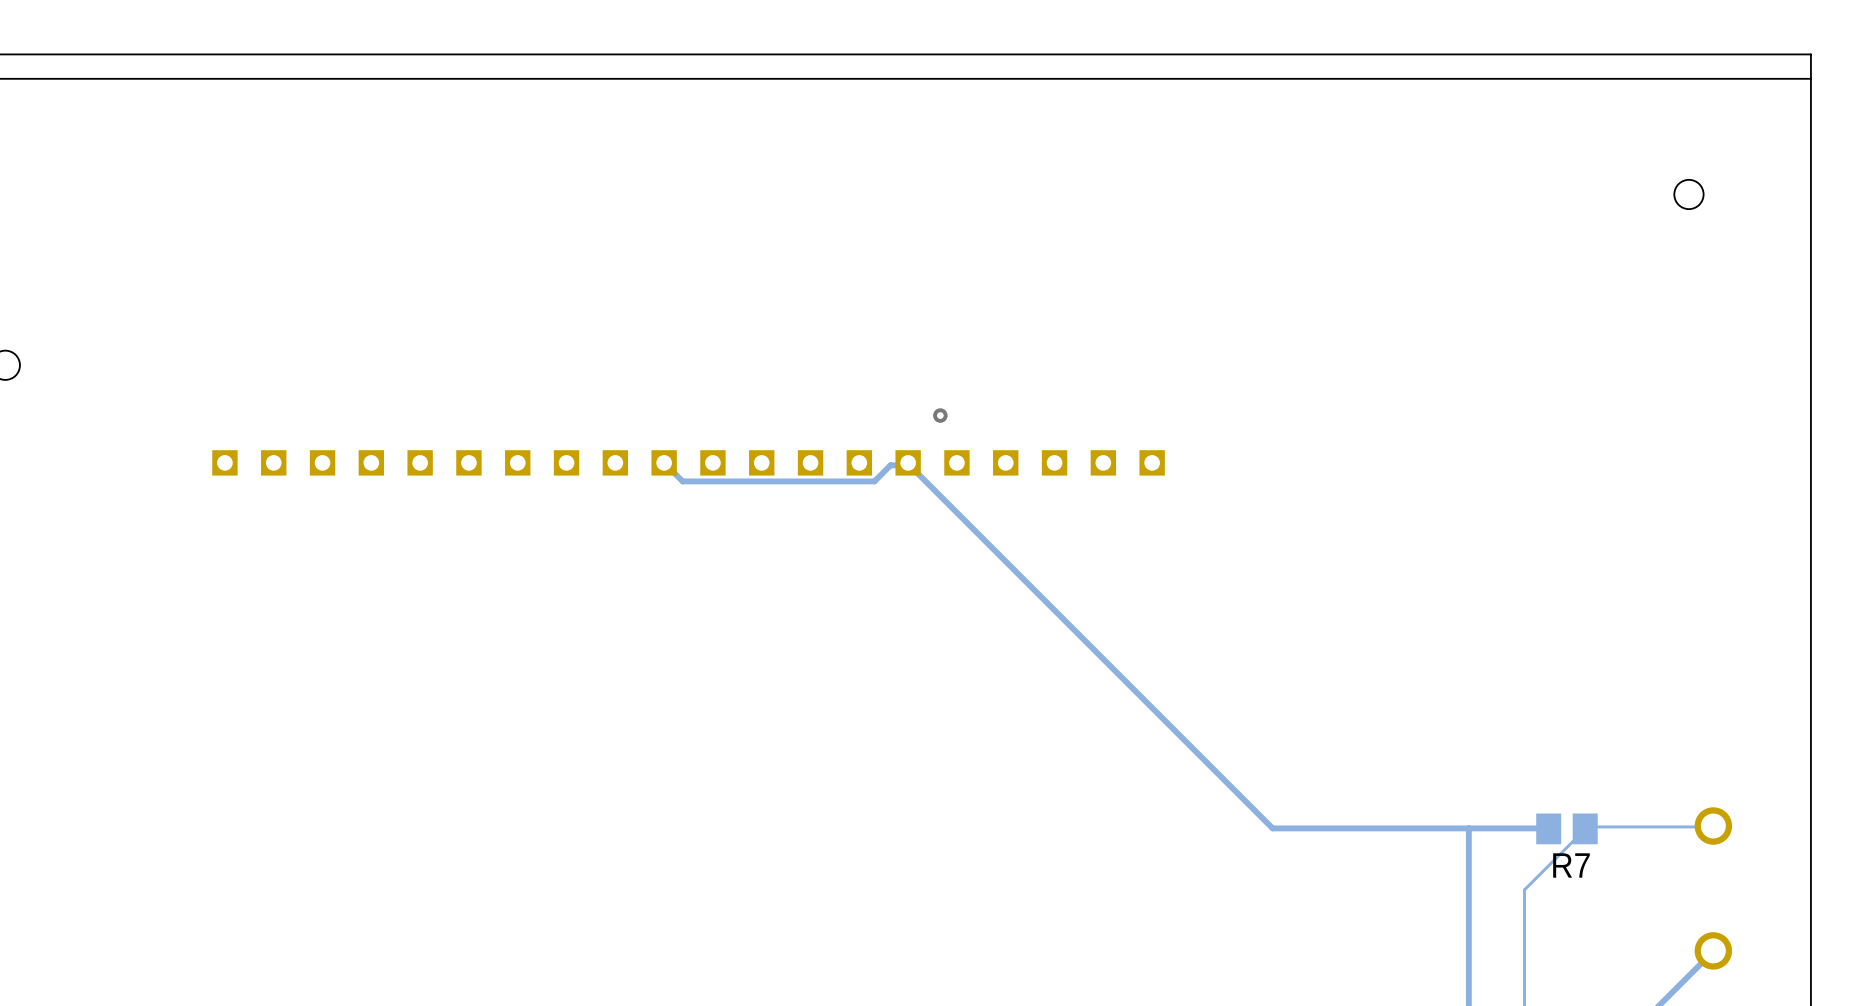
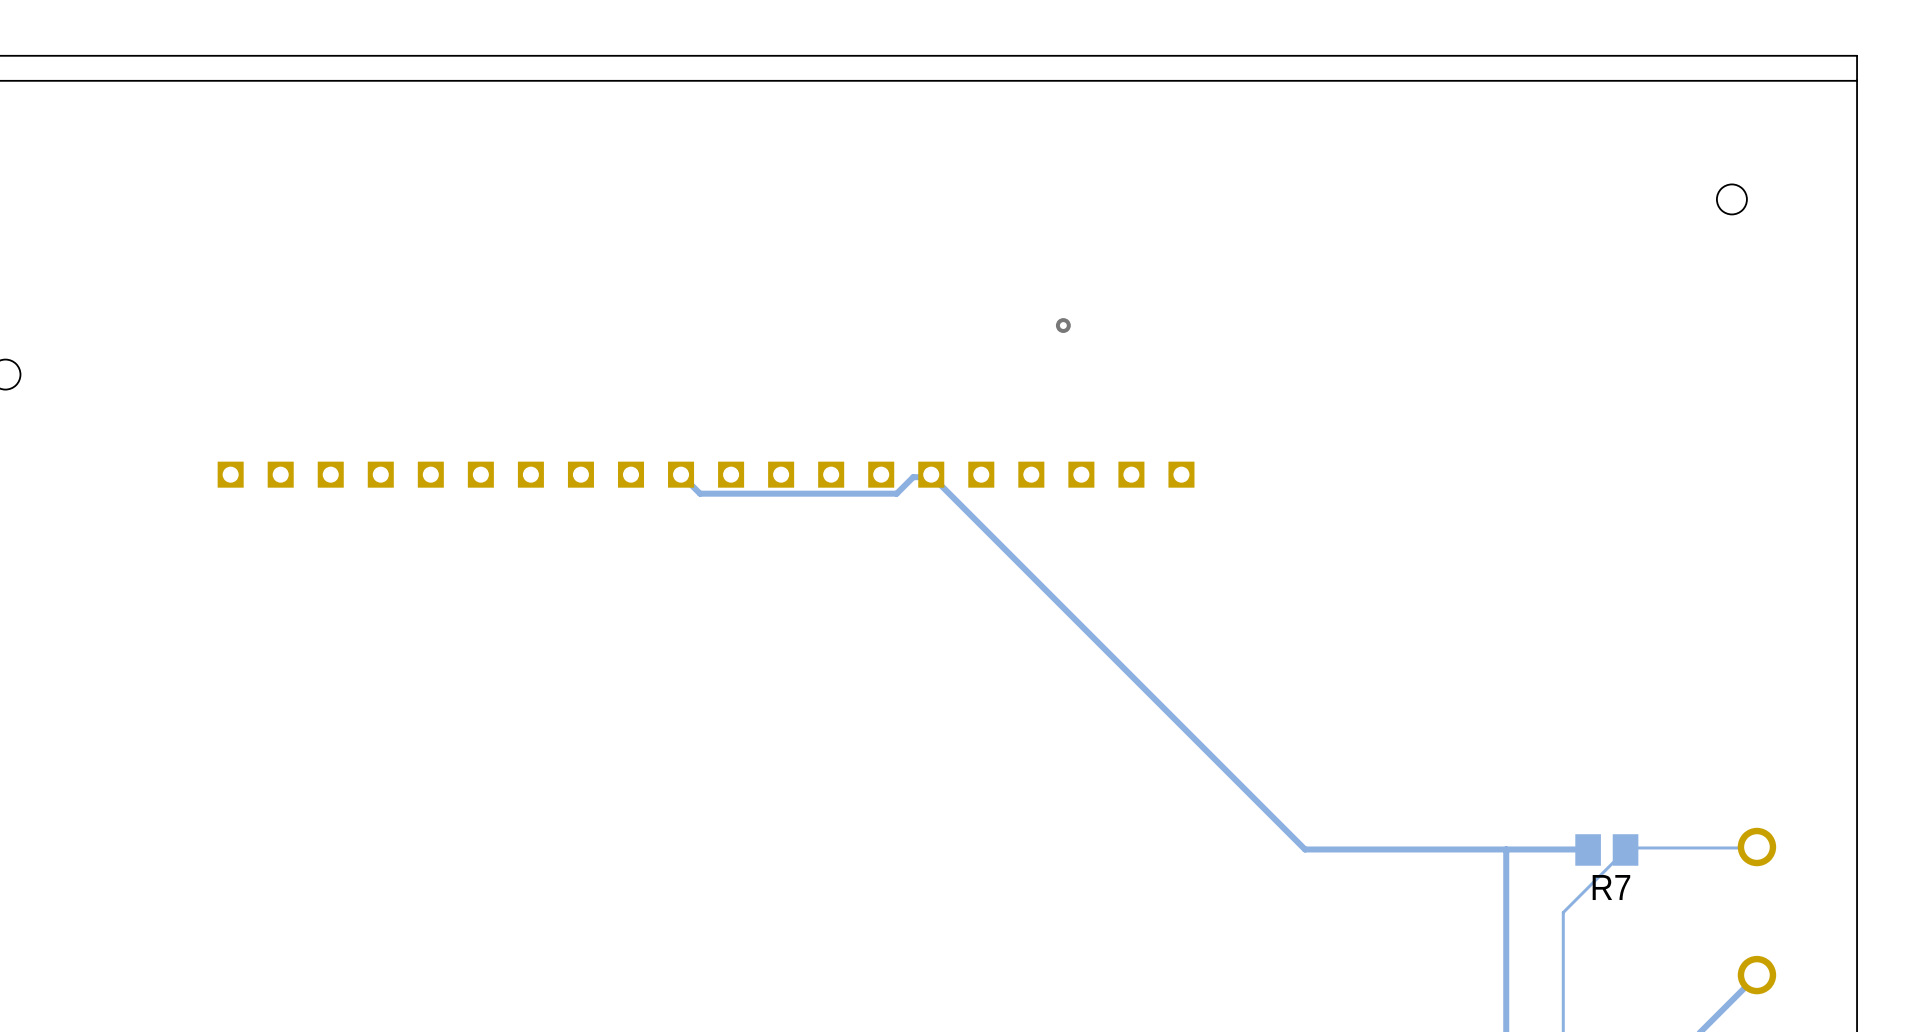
via: none -> (1063, 325)
via: (940, 415) -> none

